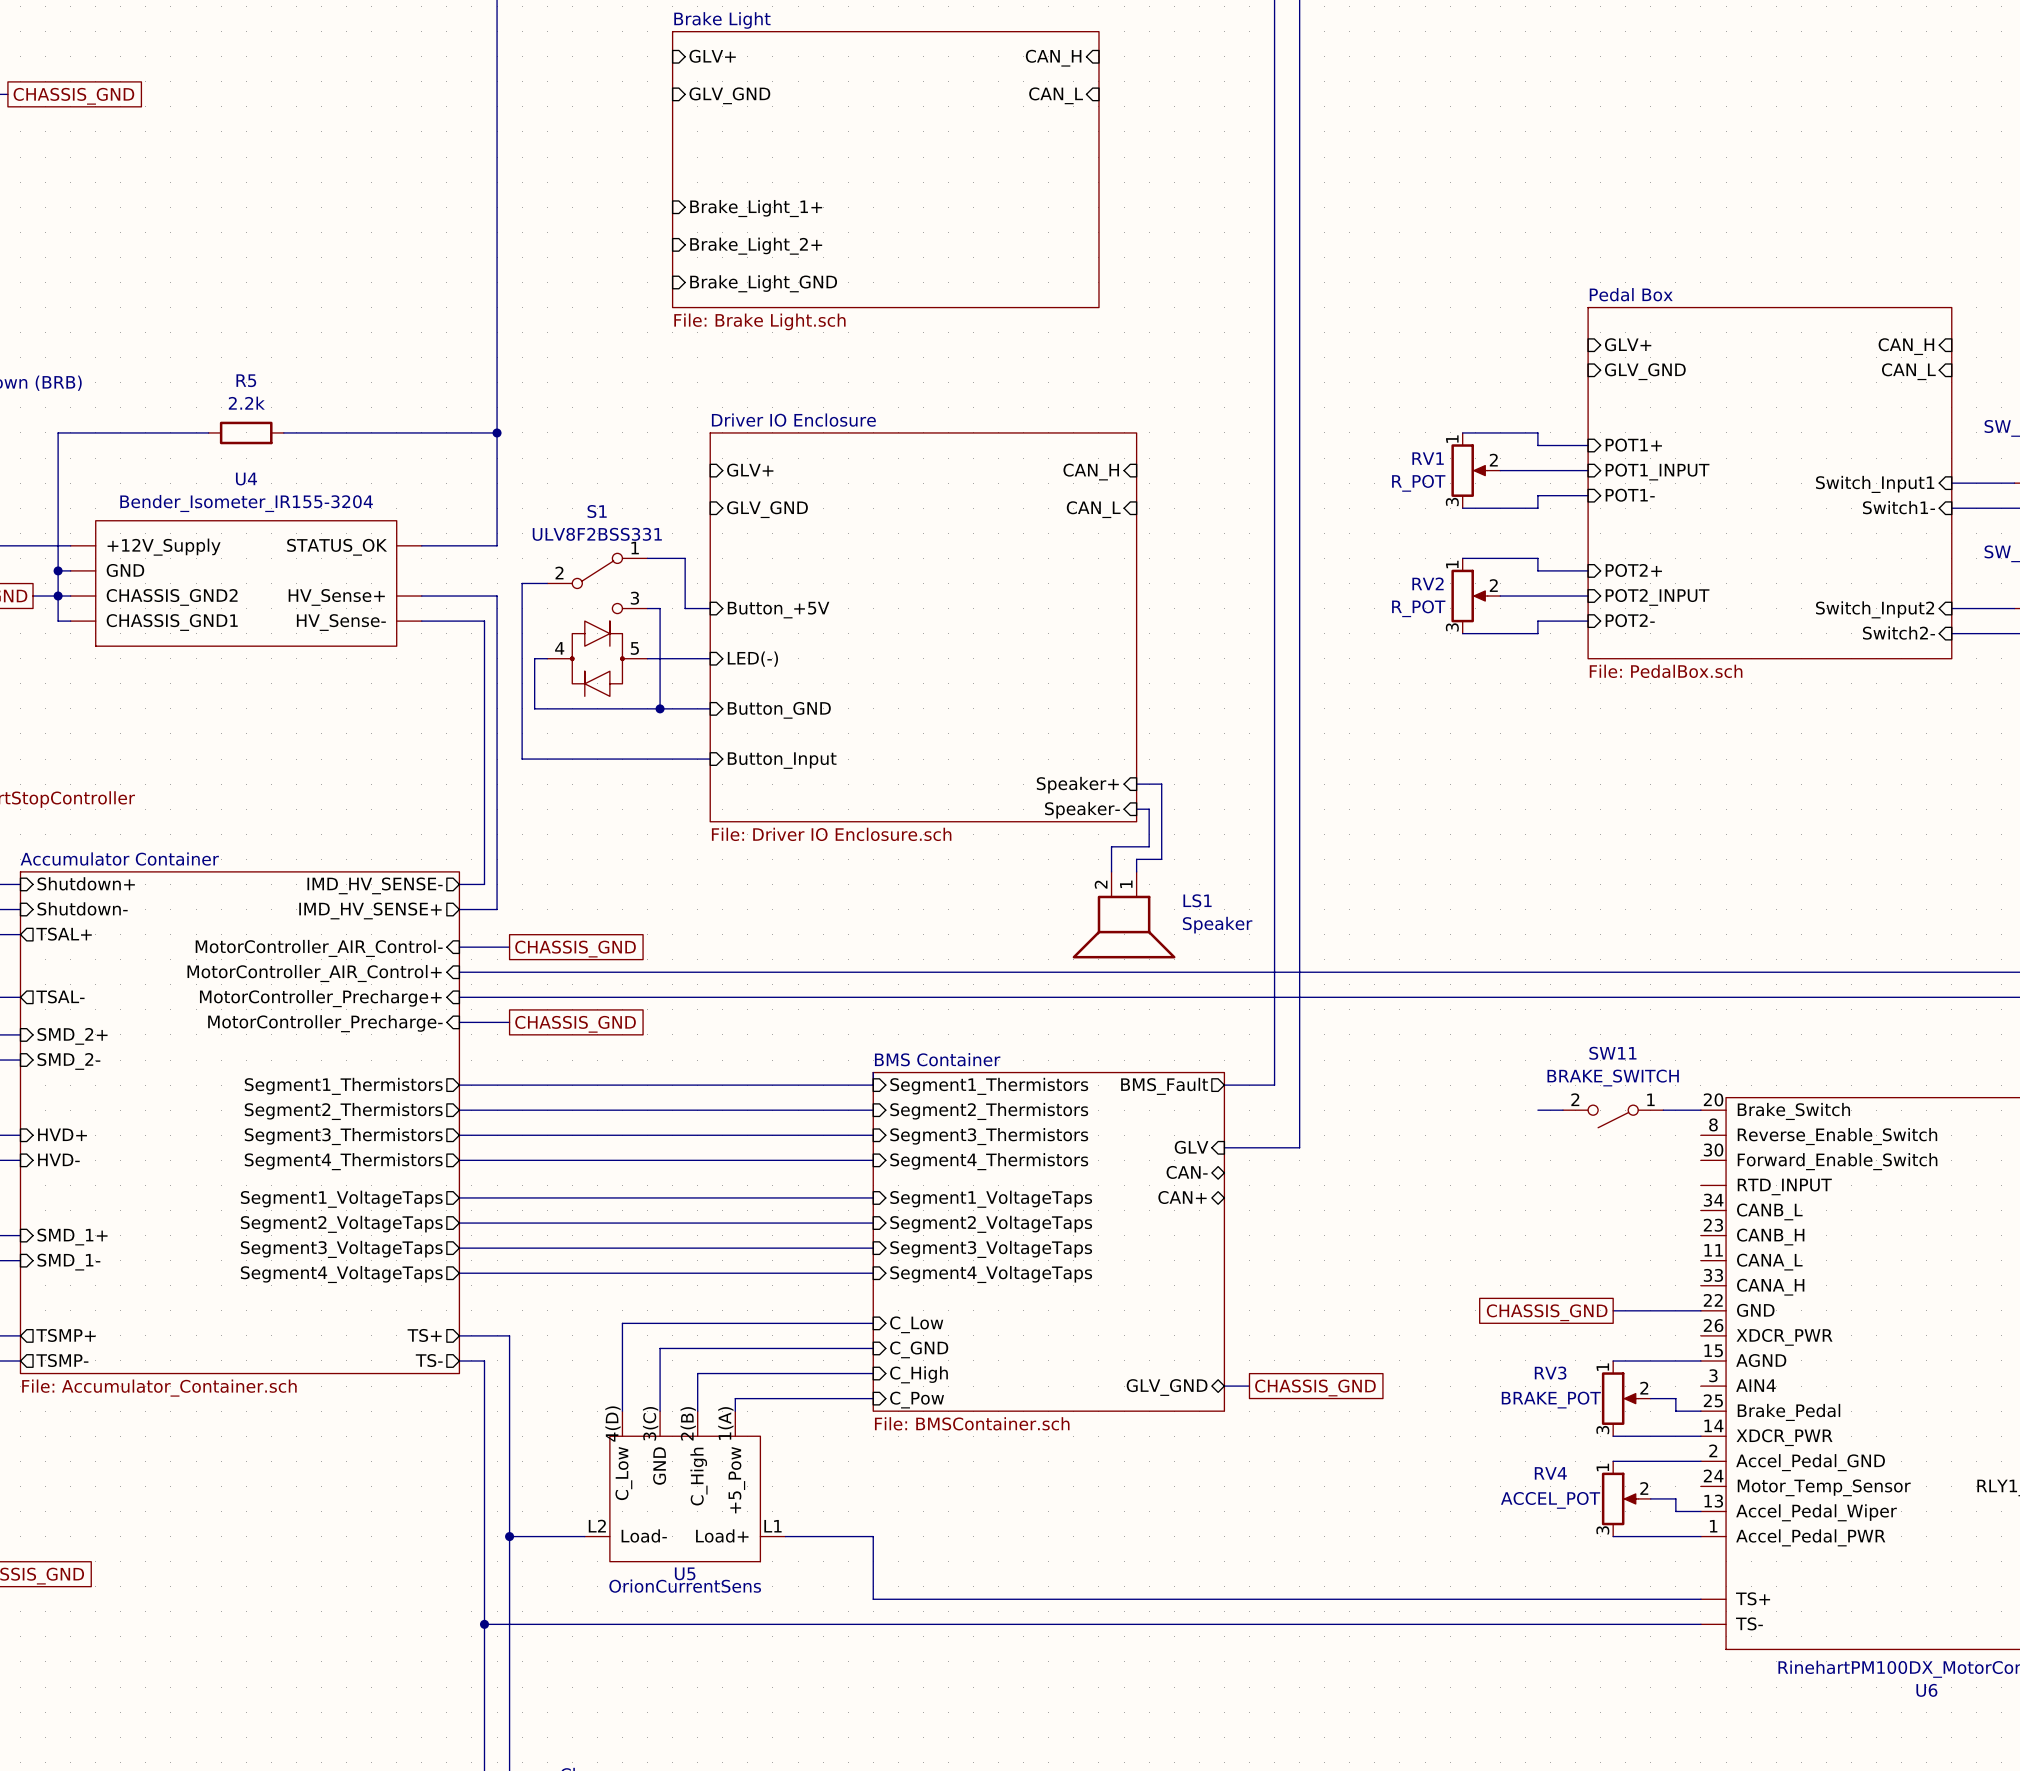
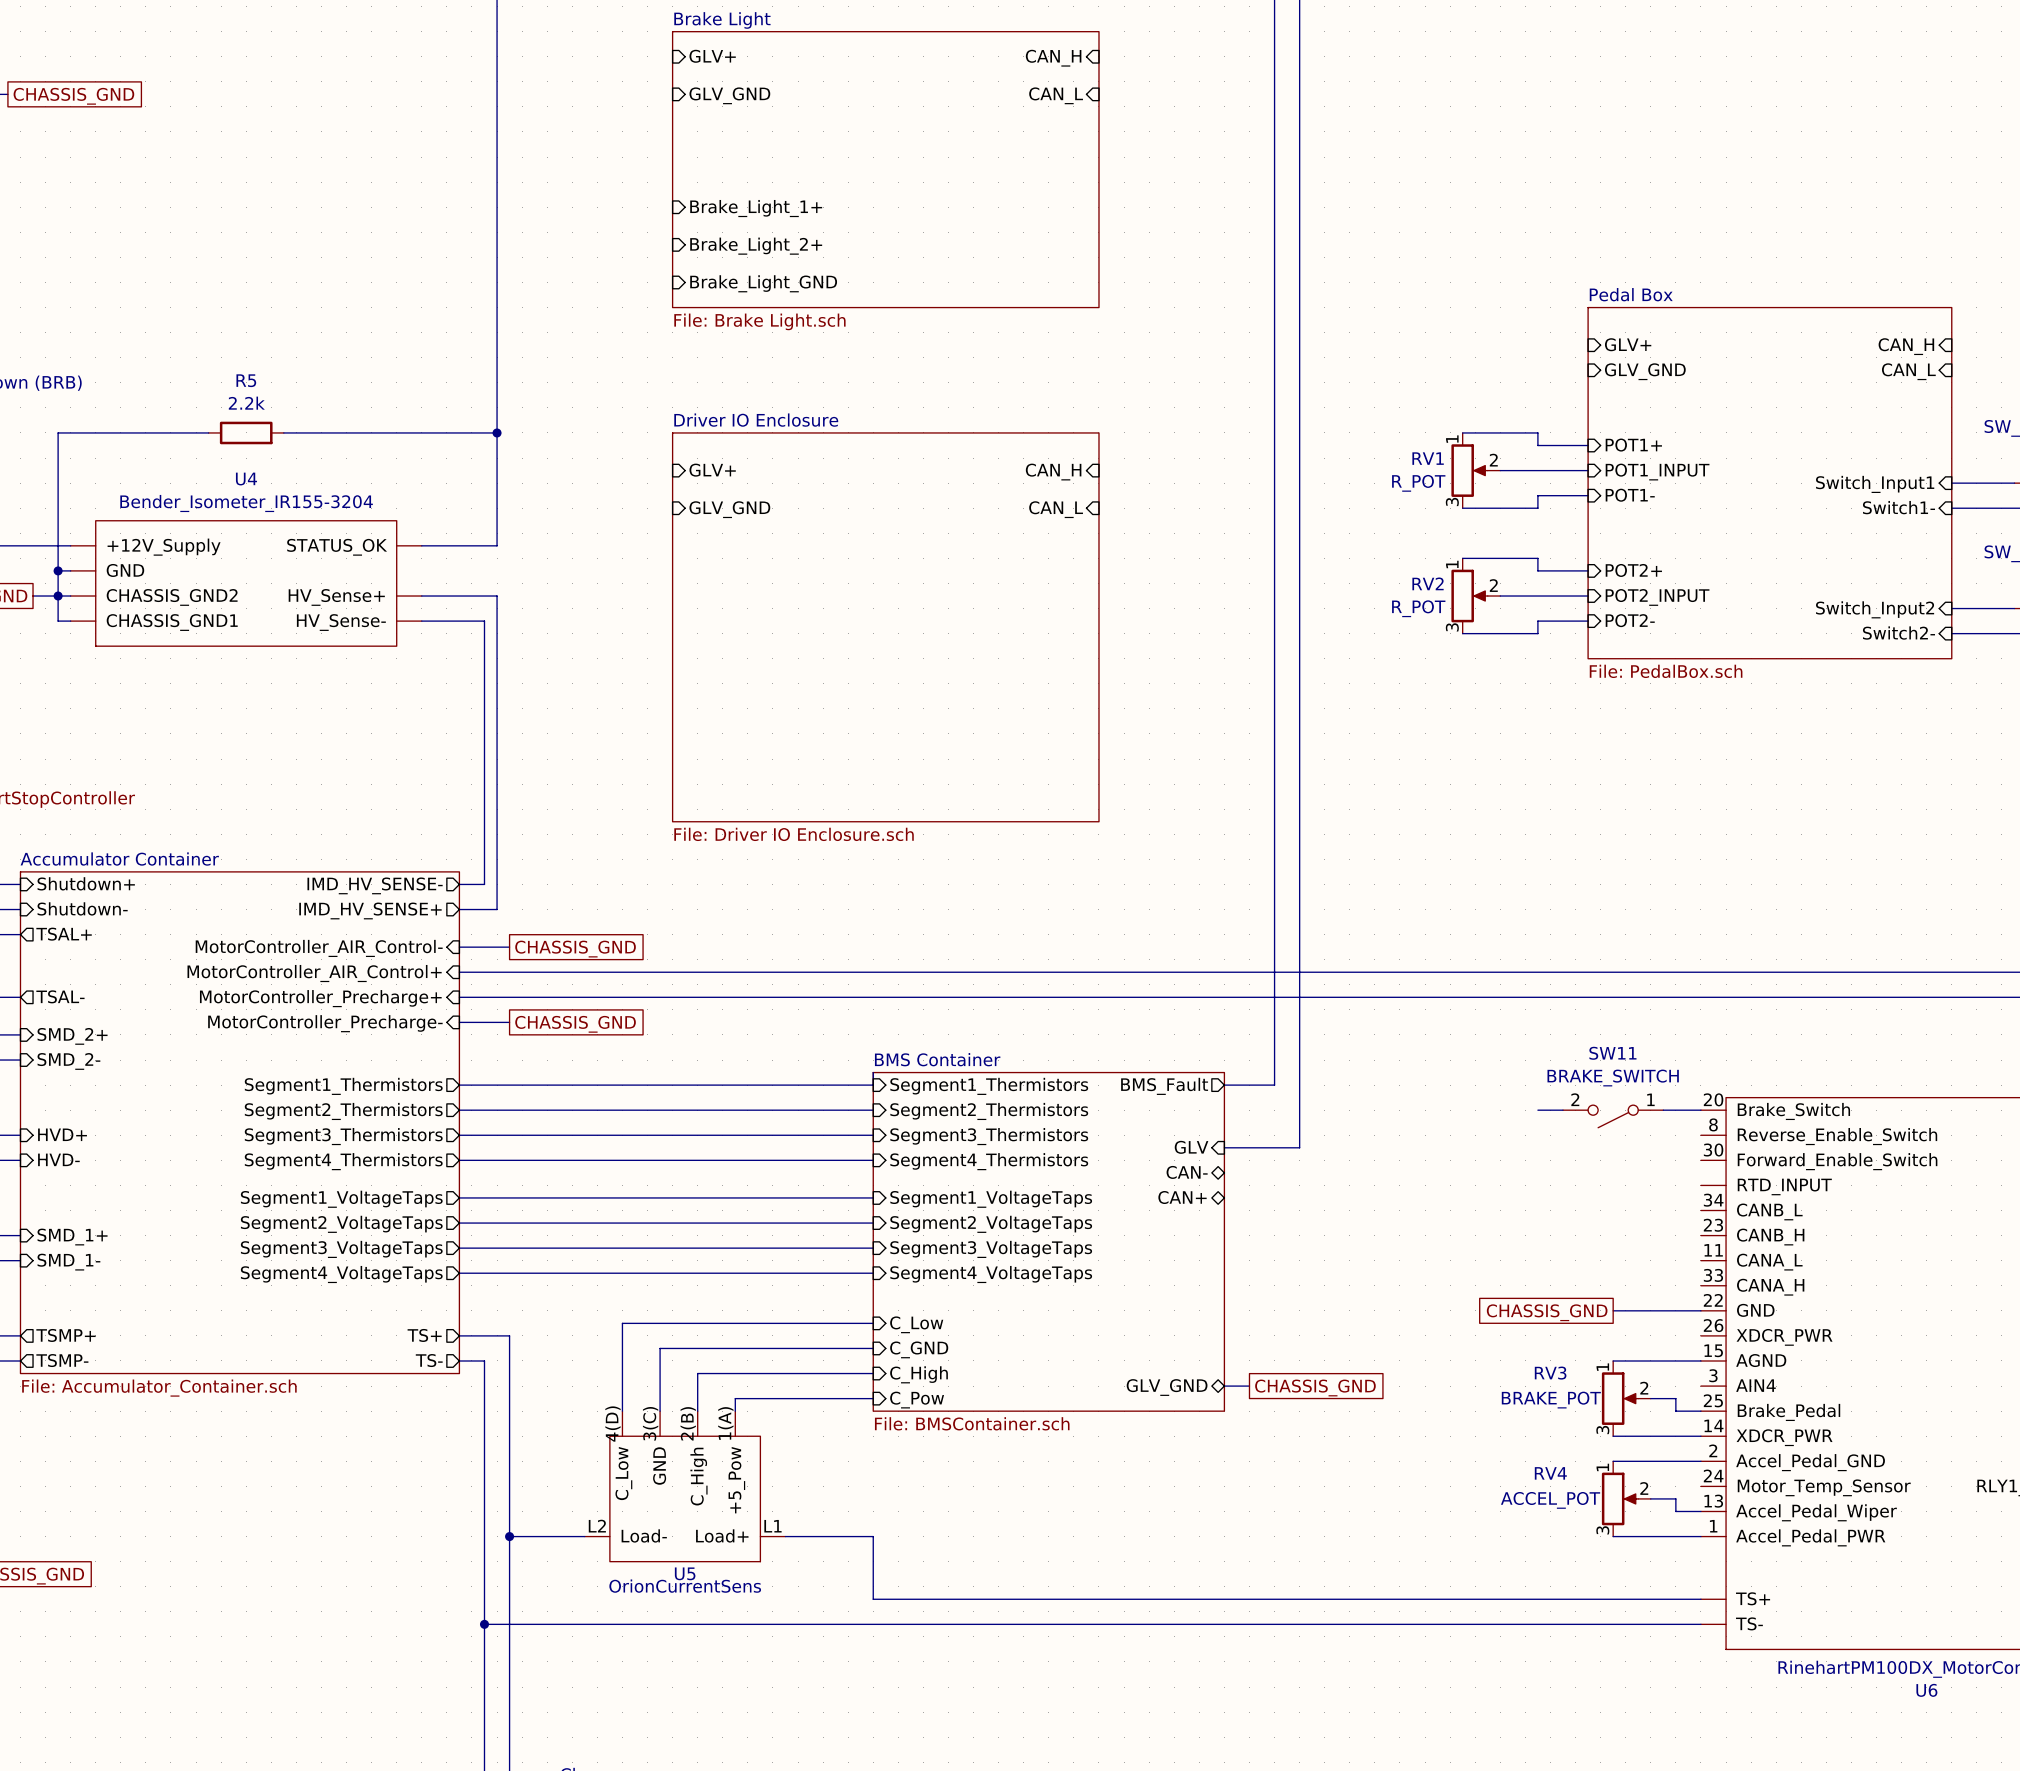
sheet pin position: GLV+ (750, 470) -> GLV+ (712, 470)
sheet pin position: CAN_H (1091, 472) -> CAN_H (1053, 472)
sheet pin position: GLV_GND (767, 509) -> GLV_GND (729, 509)
sheet pin position: CAN_L (1093, 509) -> CAN_L (1056, 509)
wire: (647, 558) (685, 558) (685, 608) (710, 608) -> none
wire: (547, 583) (522, 583) (522, 759) (710, 759) -> none
wire: (647, 608) (660, 608) (660, 708) -> none
sheet pin: Button_+5V (778, 610) -> none
S1: ULV8F2BSS331 (597, 624) -> none
sheet Driver IO Enclosure position: (923, 627) -> (885, 627)
wire: (547, 658) (534, 658) (534, 708) (710, 708) -> none
wire: (647, 658) (710, 658) -> none
sheet pin: LED(-) (752, 659) -> none
junction: (660, 708) -> none
sheet pin: Button_GND (779, 710) -> none
sheet pin: Button_Input (782, 760) -> none
wire: (1136, 784) (1161, 784) (1161, 859) (1136, 859) (1136, 871) -> none
sheet pin: Speaker+ (1077, 785) -> none
wire: (1136, 809) (1149, 809) (1149, 846) (1111, 846) (1111, 871) -> none
sheet pin: Speaker- (1082, 810) -> none
LS1: Speaker (1124, 915) -> none

